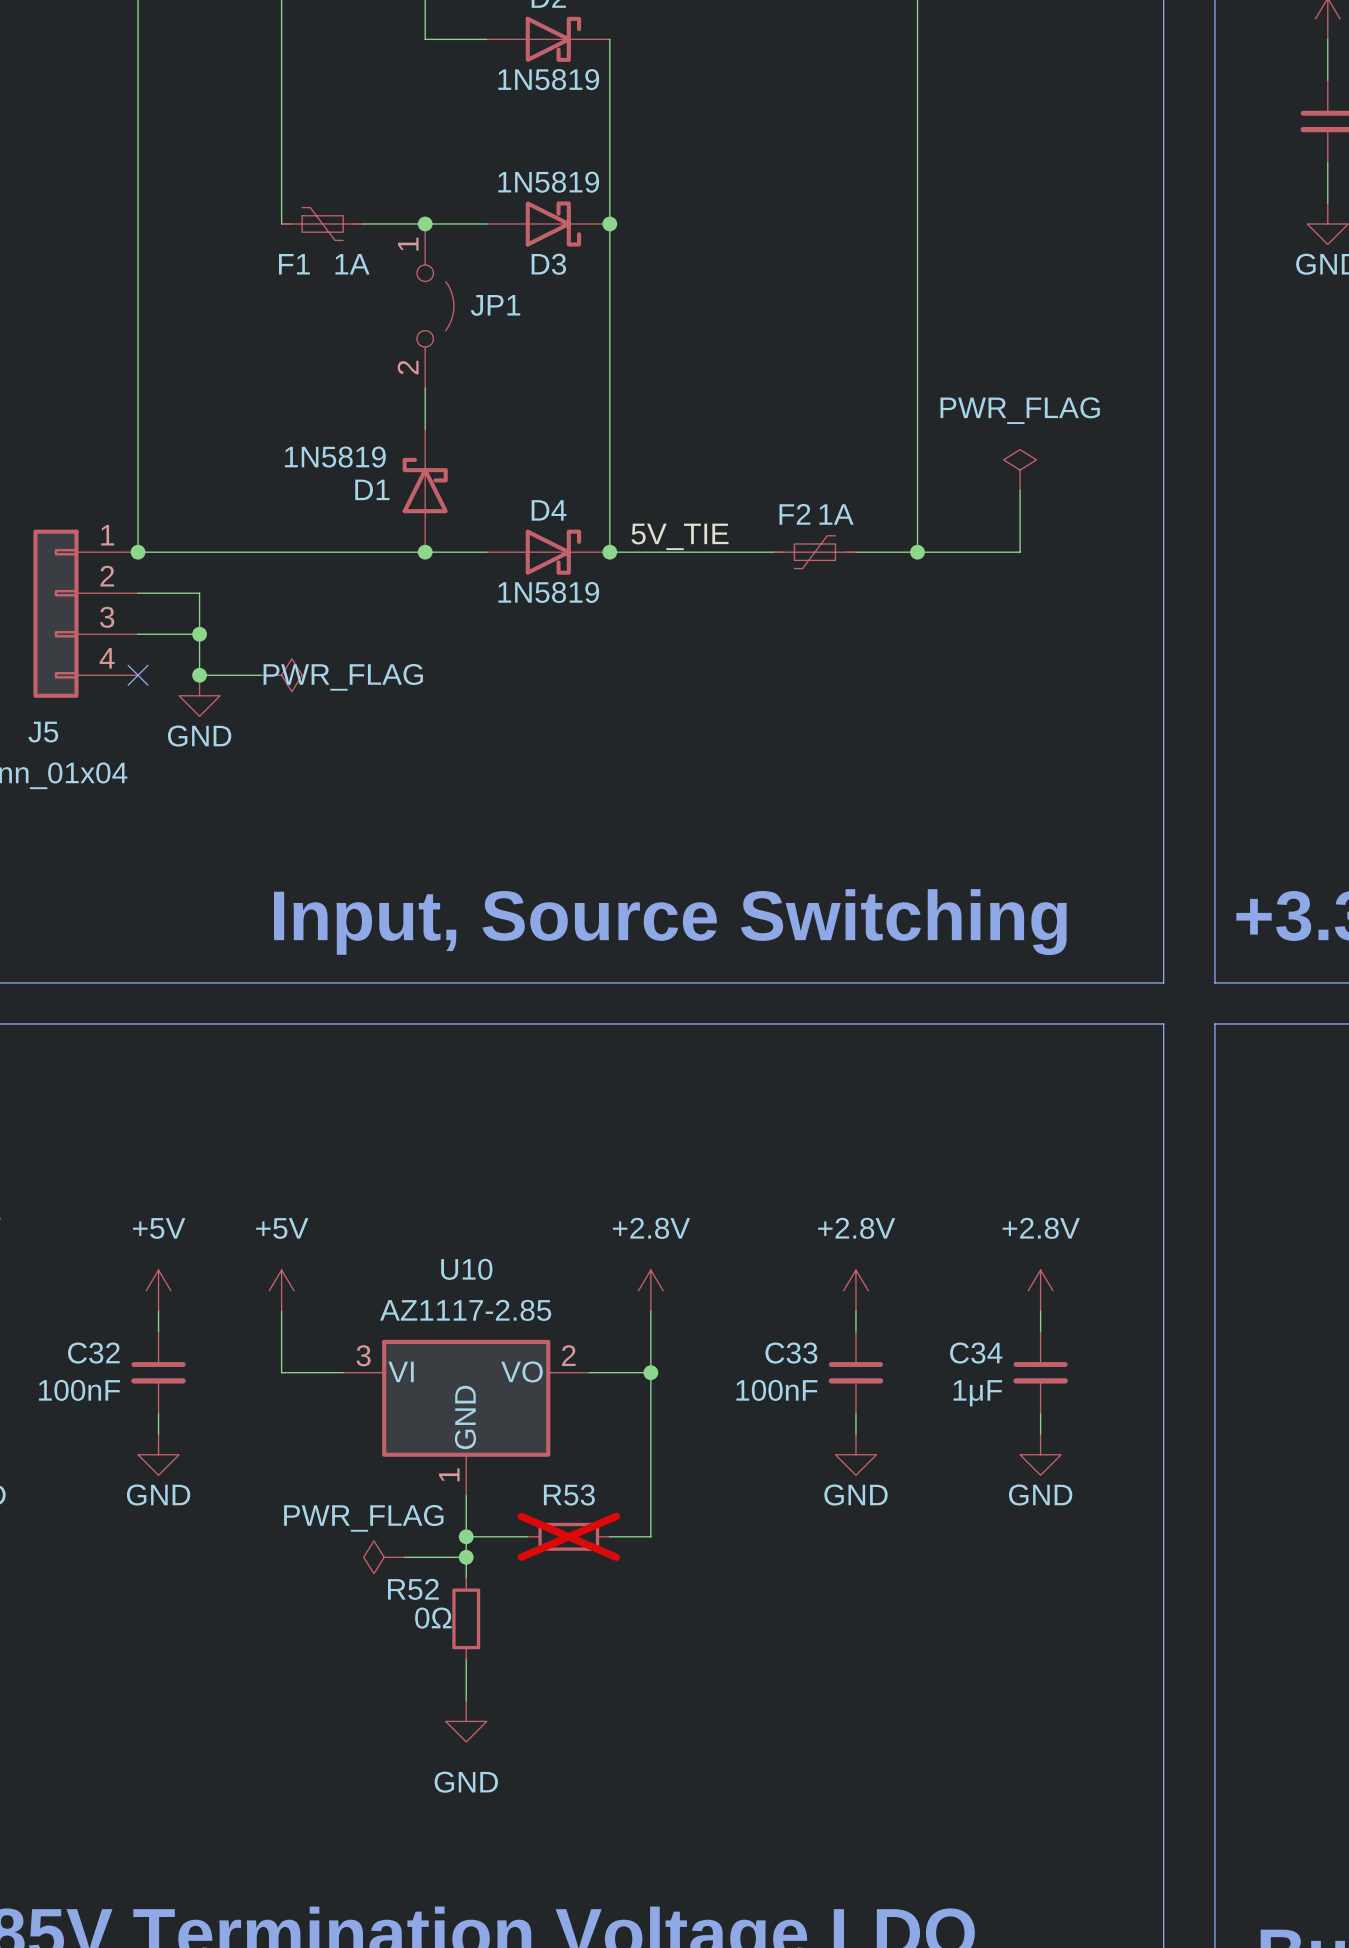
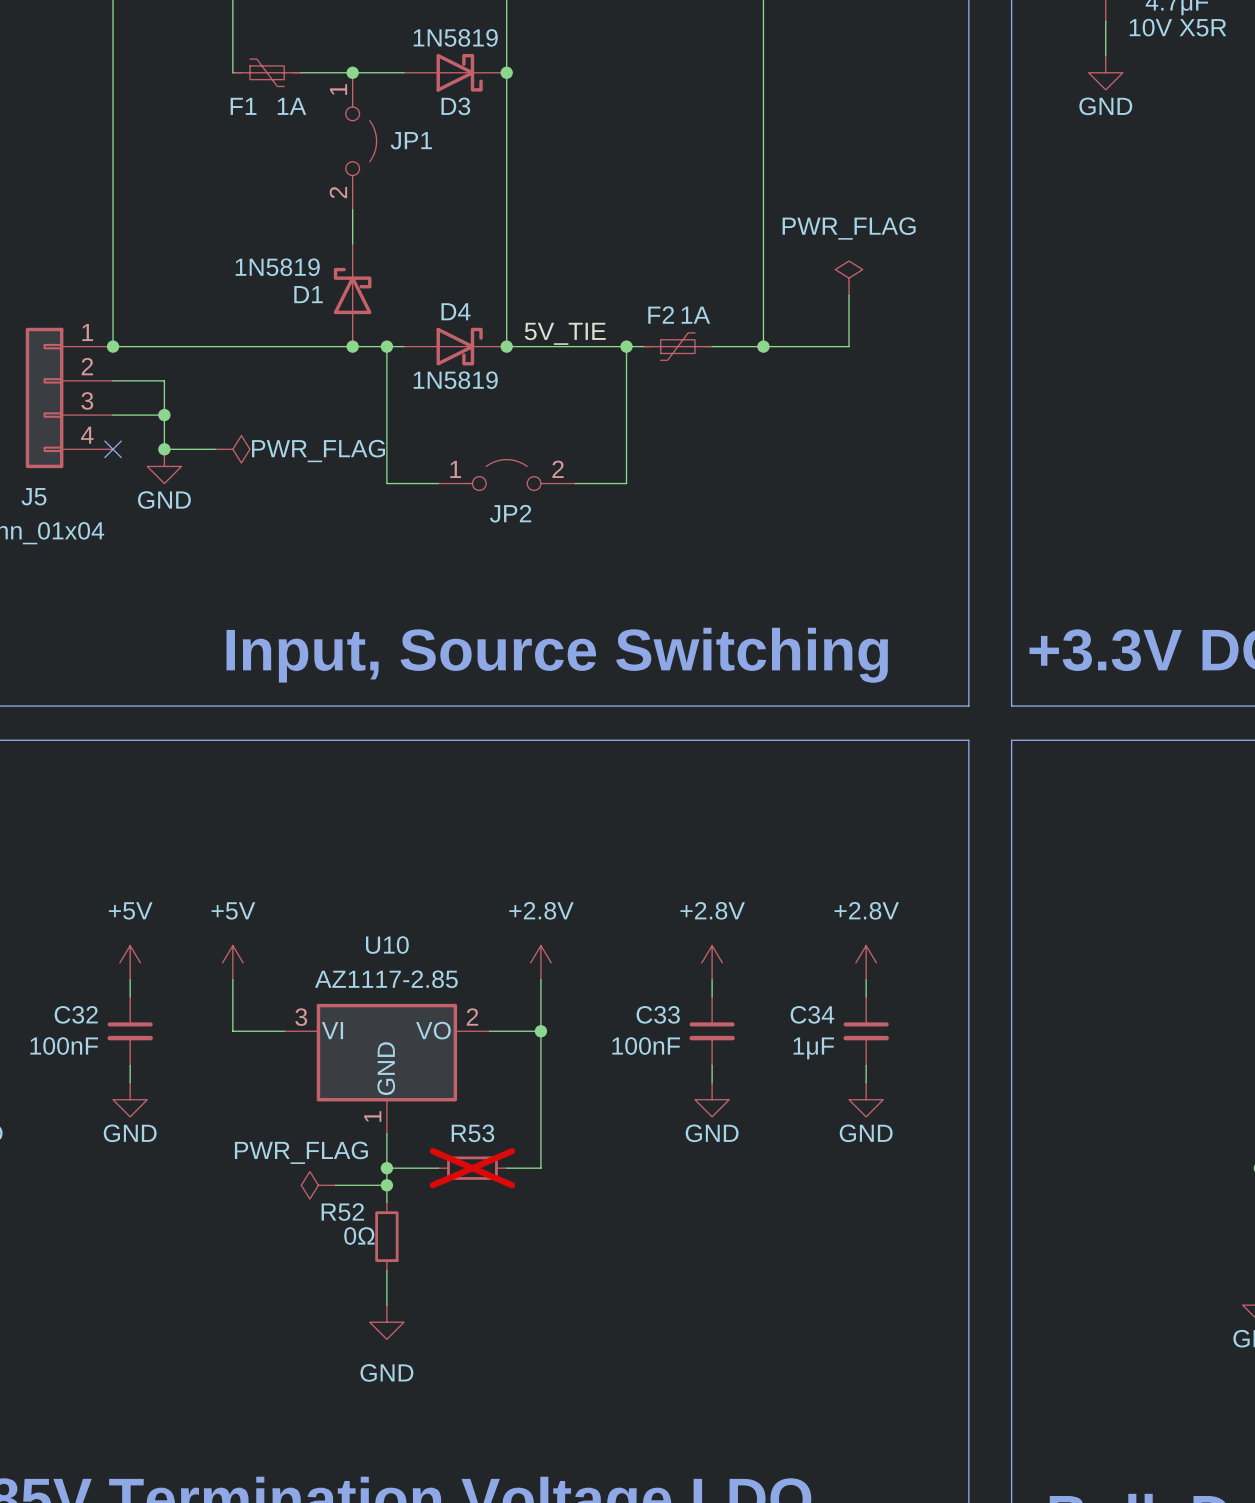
wire: none -> (386, 346) (386, 483) (438, 483)
junction: none -> (386, 346)
wire: none -> (626, 346) (626, 483) (575, 483)
junction: none -> (626, 346)
power symbol text position: PWR_FLAG (343, 677) -> PWR_FLAG (318, 451)
JP2: none -> (506, 474)

